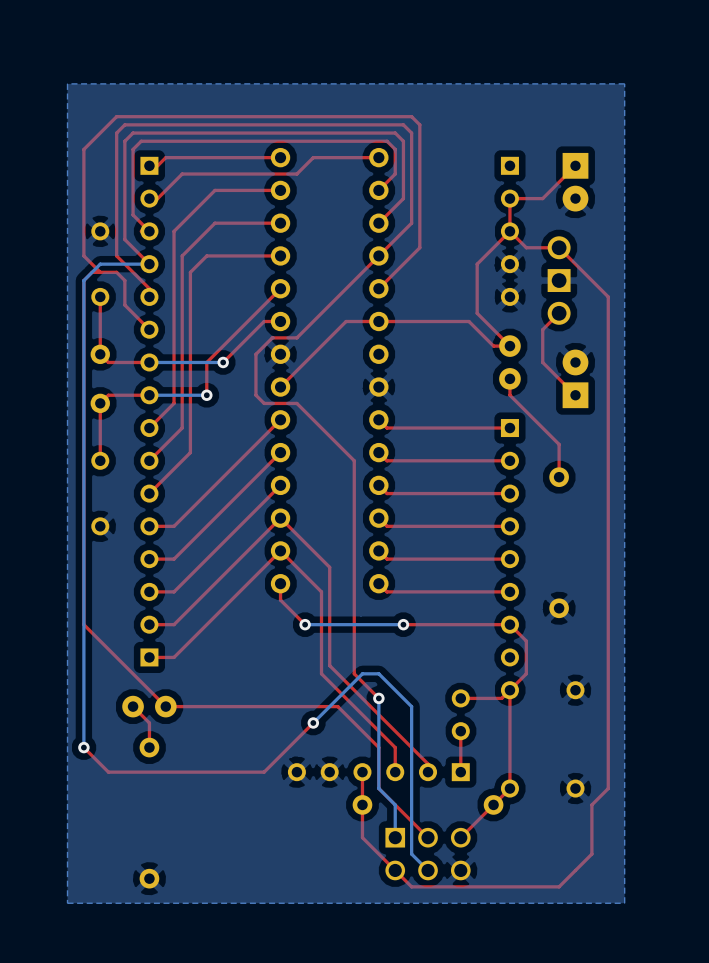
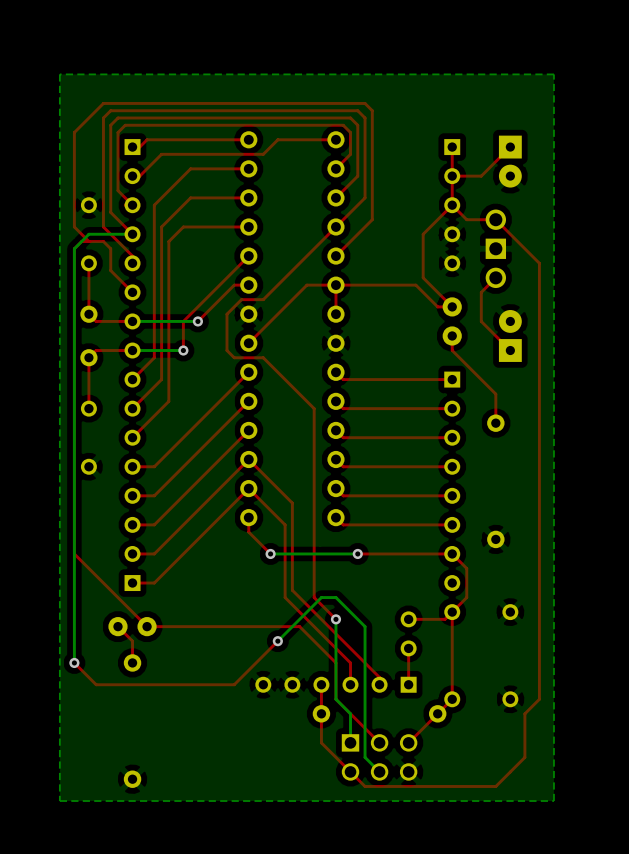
top track: none -> (452, 147) (452, 176)
top track: none -> (335, 285) (335, 314)

